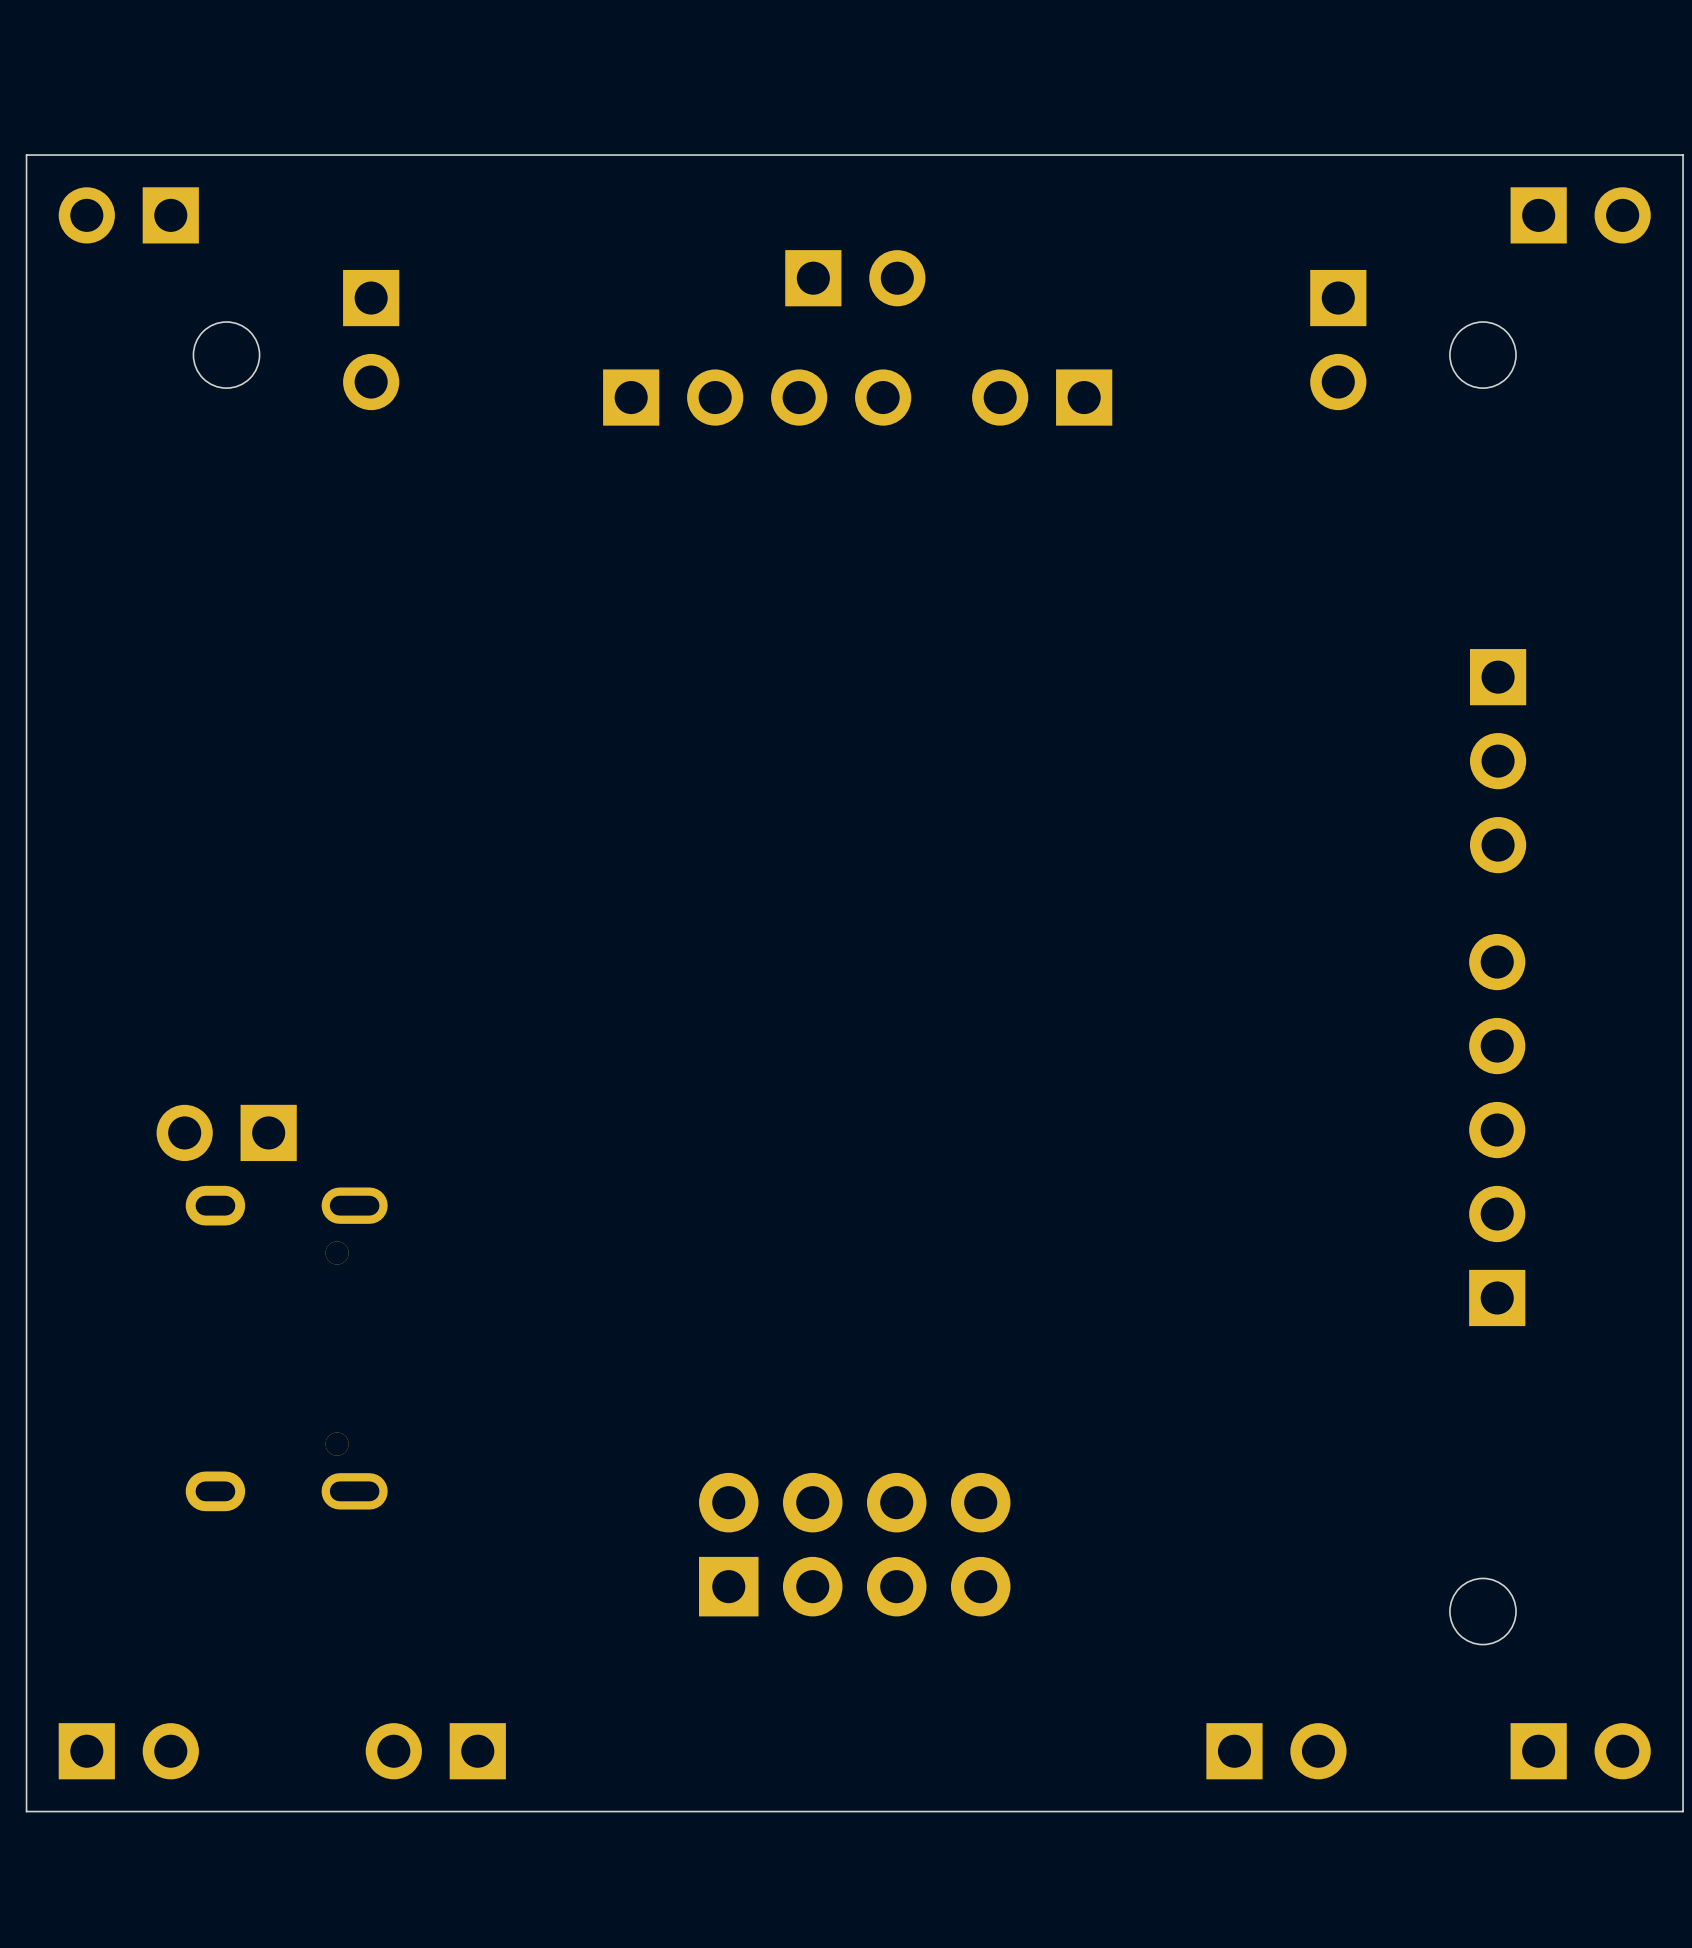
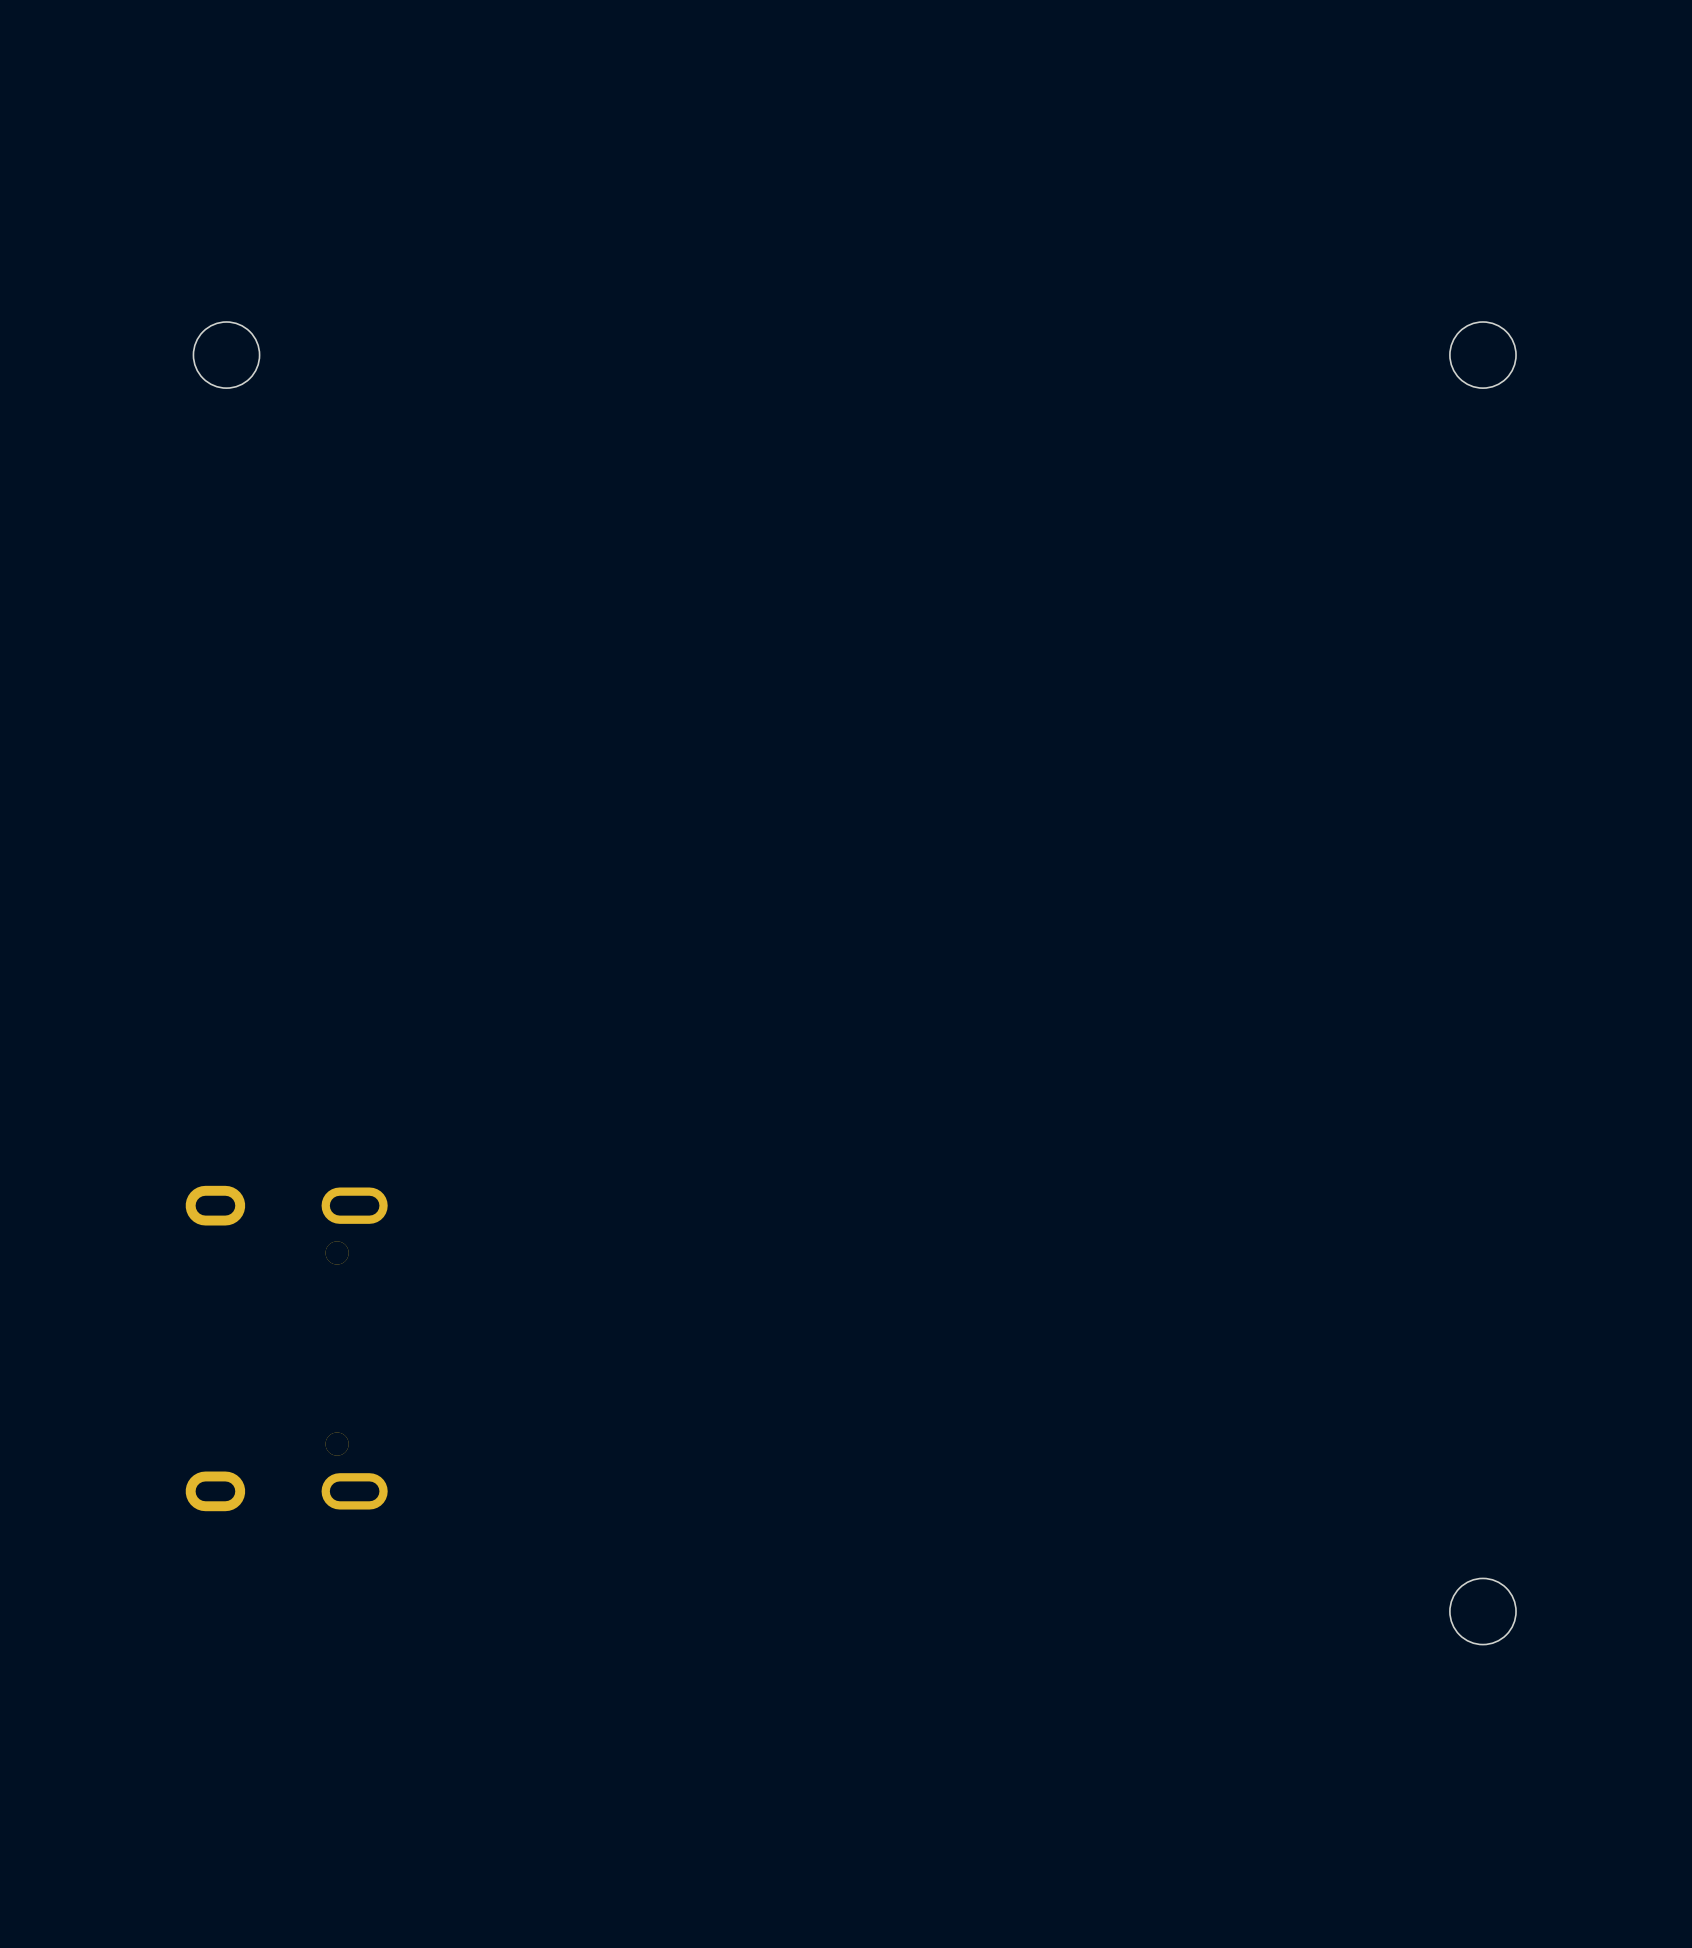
board edge: (1683, 155) (26, 155) (26, 1811) (1683, 1811) (1683, 155) -> none
part: (128, 215) -> none
part: (1580, 215) -> none
part: (855, 278) -> none
part: (371, 340) -> none
part: (1338, 340) -> none
part: (757, 397) -> none
part: (1042, 397) -> none
part: (1498, 761) -> none
part: (1497, 1130) -> none
part: (226, 1132) -> none
part: (854, 1544) -> none
part: (128, 1751) -> none
part: (435, 1751) -> none
part: (1276, 1751) -> none
part: (1580, 1751) -> none

